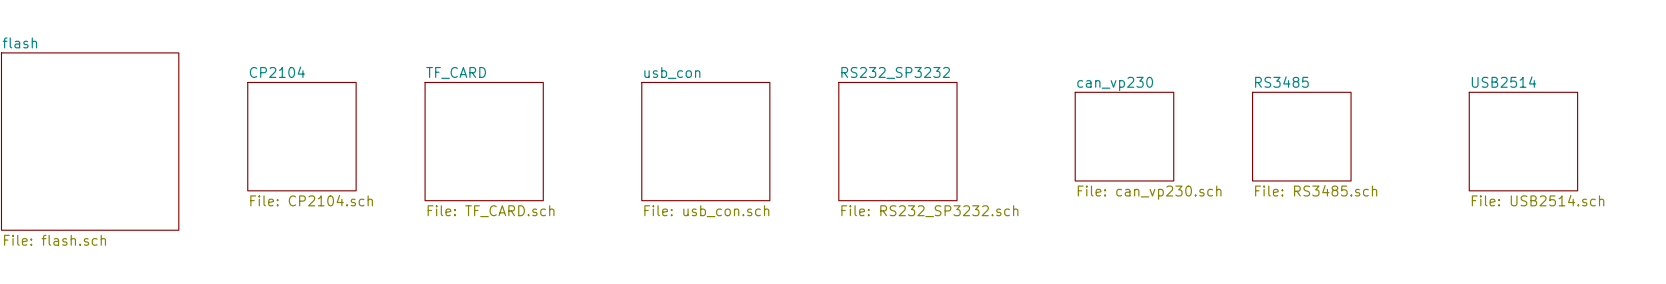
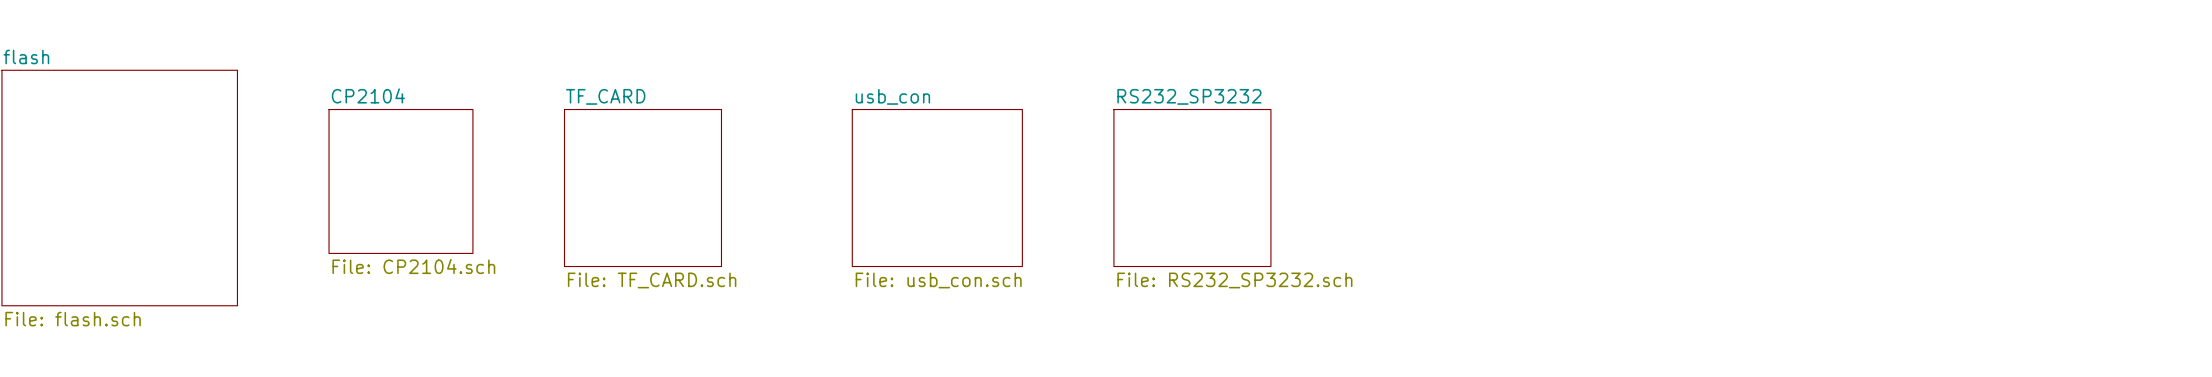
sheet can_vp230: File: can_vp230.sch (1124, 136) -> none
sheet RS3485: File: RS3485.sch (1301, 136) -> none
sheet USB2514: File: USB2514.sch (1523, 141) -> none

